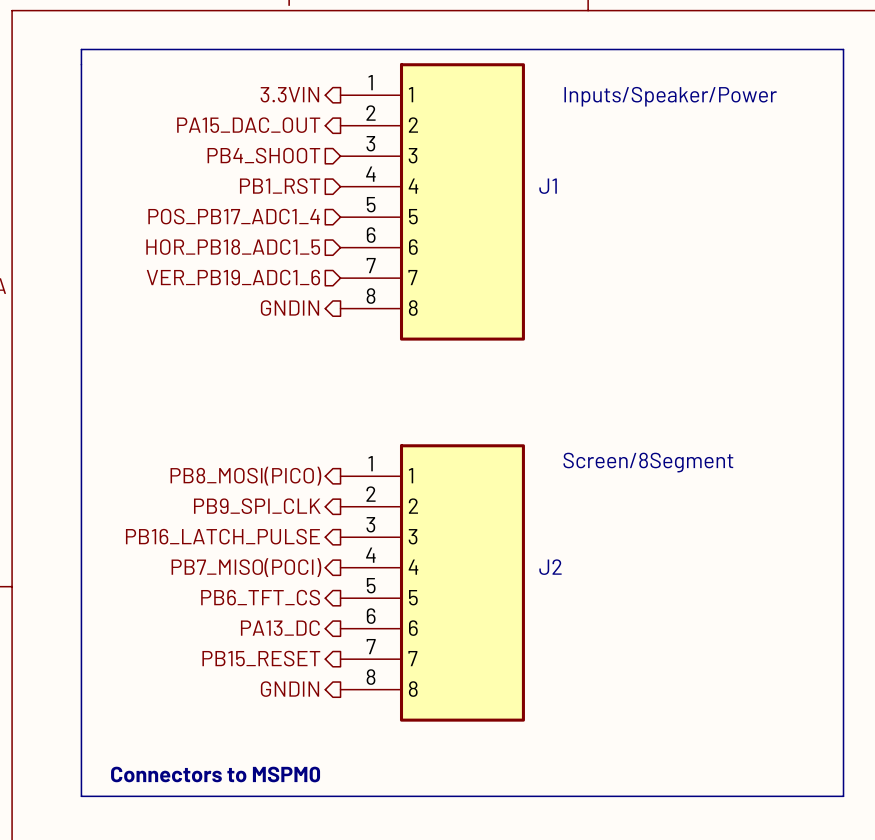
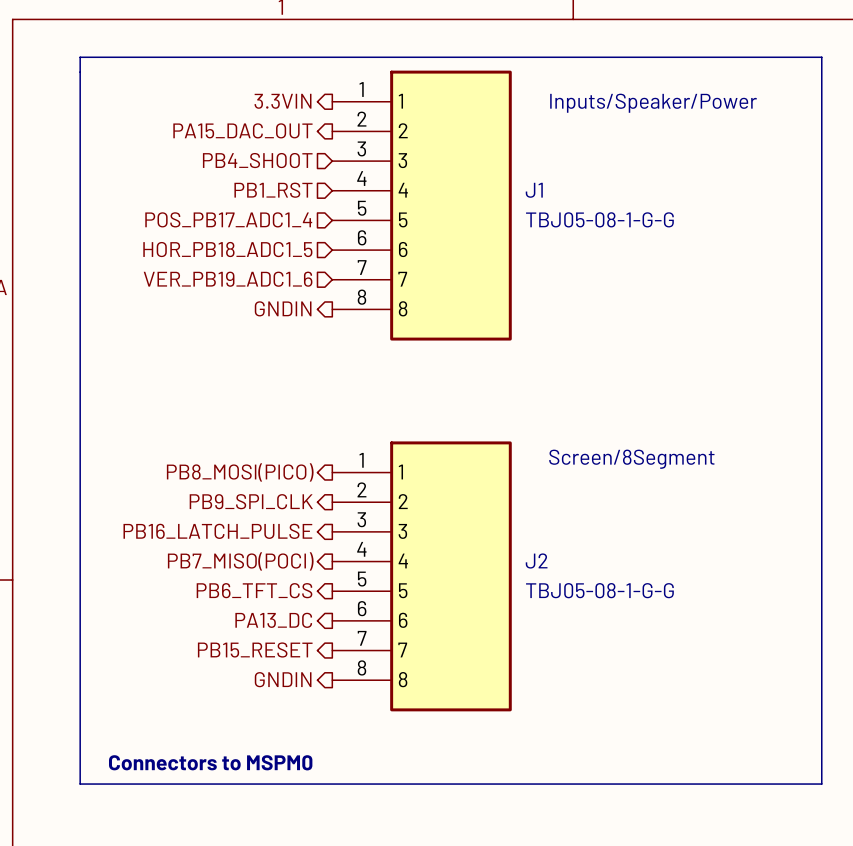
J1 value: none -> TBJ05-08-1-G-G (599, 219)
J2 value: none -> TBJ05-08-1-G-G (599, 590)

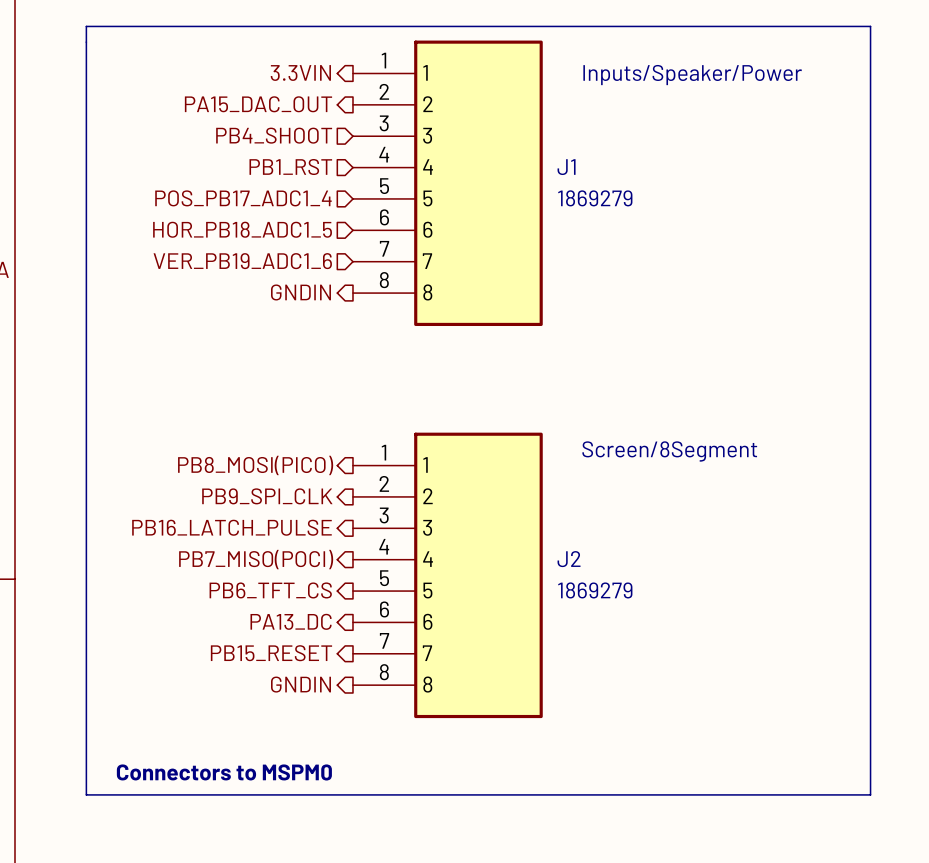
J1 value: TBJ05-08-1-G-G (599, 219) -> 1869279 (595, 198)
J2 value: TBJ05-08-1-G-G (599, 590) -> 1869279 (595, 590)

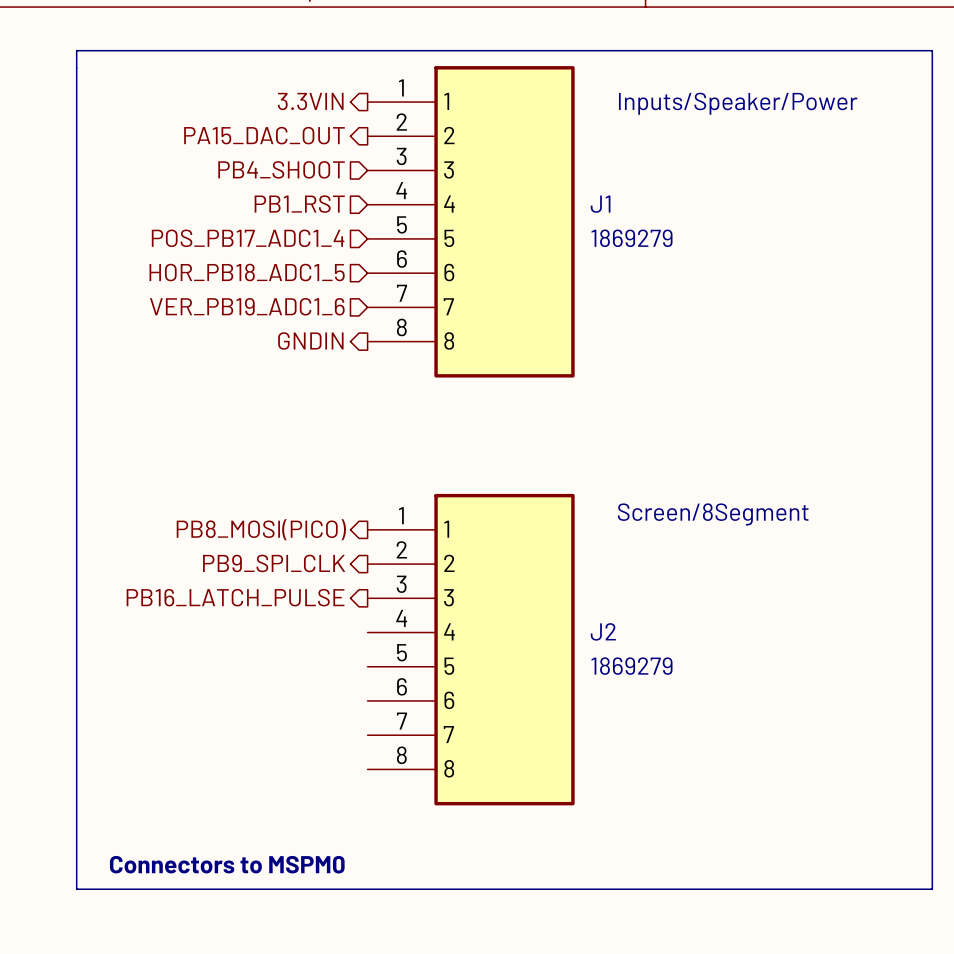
hierarchical label: PB7_MISO(POCI) (256, 559) -> none
hierarchical label: PB6_TFT_CS (270, 590) -> none
hierarchical label: PA13_DC (291, 621) -> none
hierarchical label: PB15_RESET (271, 653) -> none
hierarchical label: GNDIN (300, 684) -> none

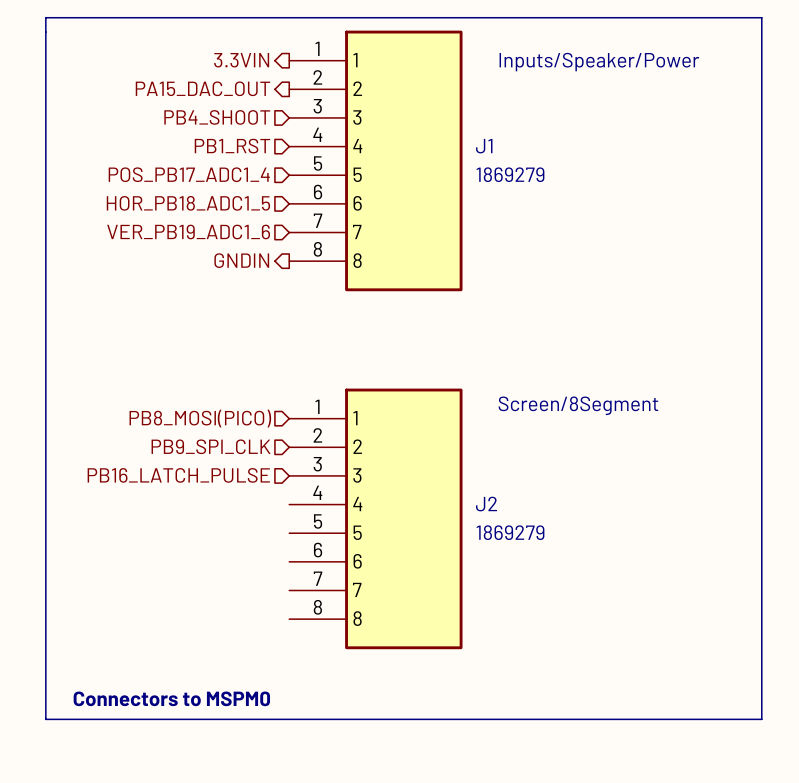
hierarchical label shape: output (261, 529) -> input (200, 418)
hierarchical label shape: output (274, 563) -> input (211, 446)
hierarchical label shape: output (235, 597) -> input (178, 475)

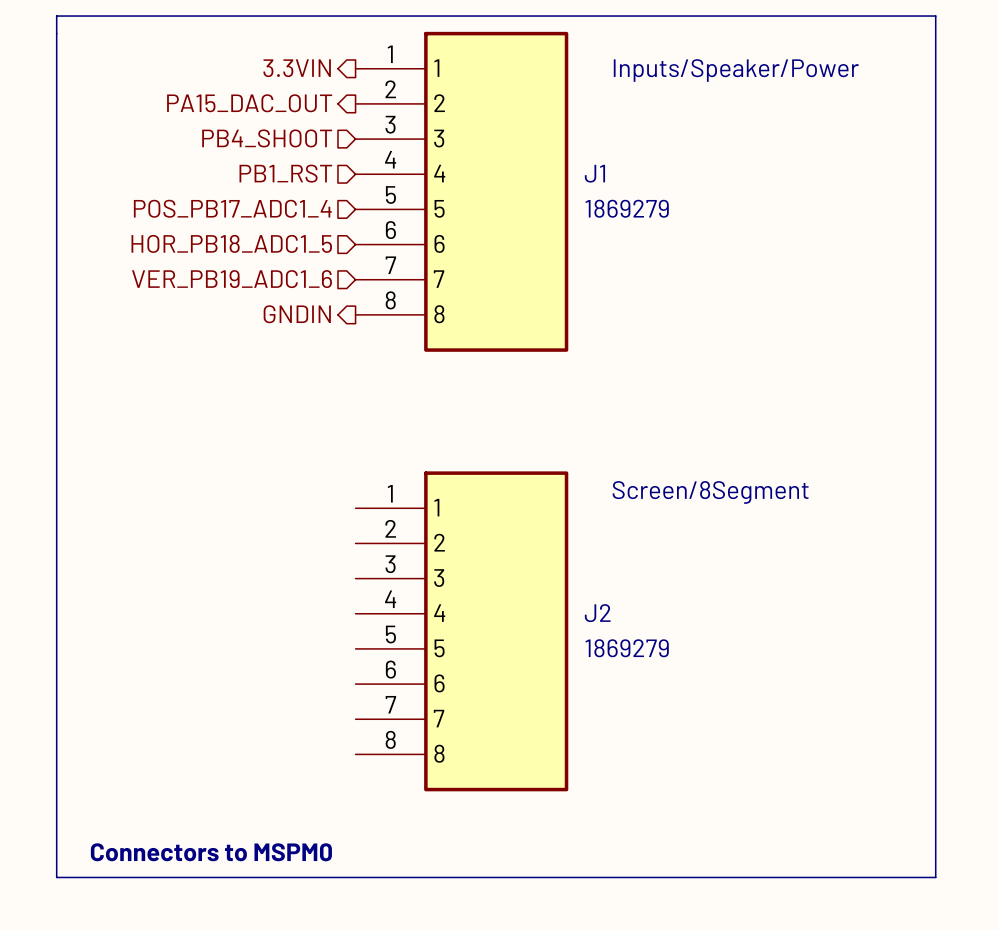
hierarchical label: PB8_MOSI(PICO) (200, 418) -> none
hierarchical label: PB9_SPI_CLK (211, 446) -> none
hierarchical label: PB16_LATCH_PULSE (178, 475) -> none

